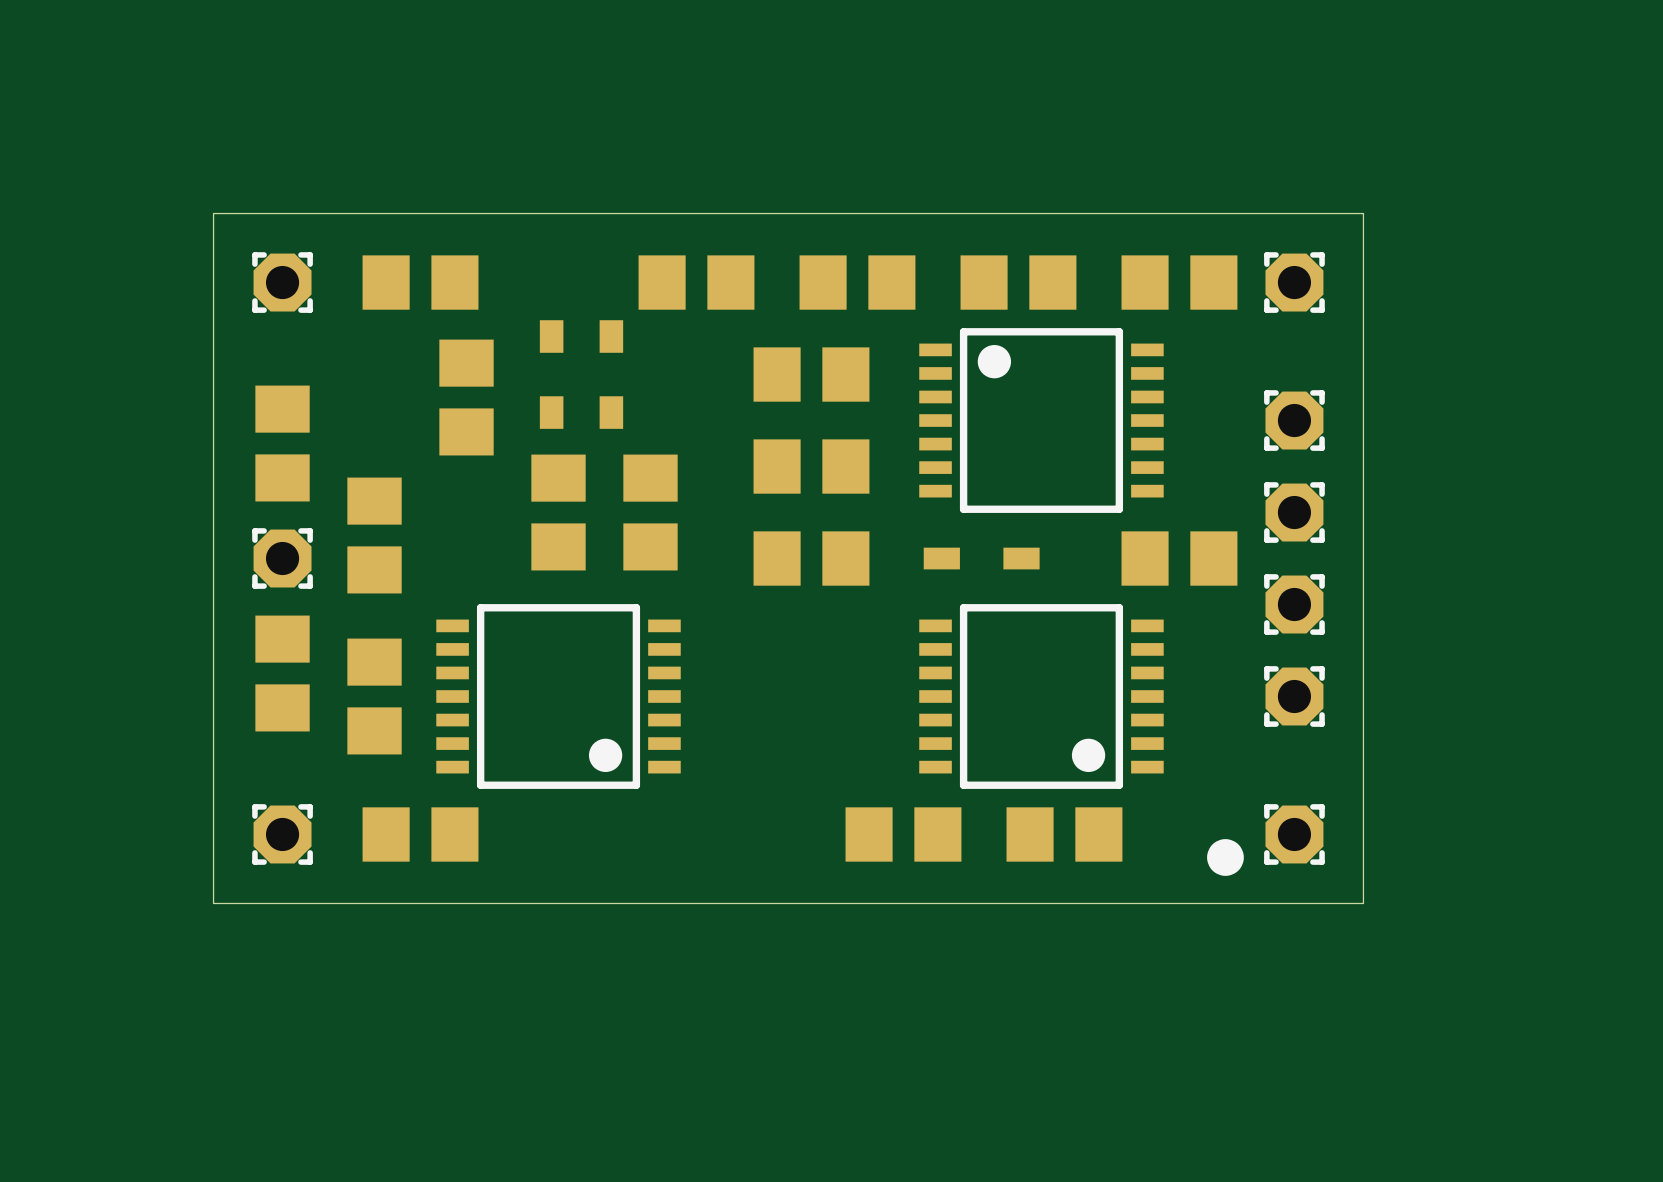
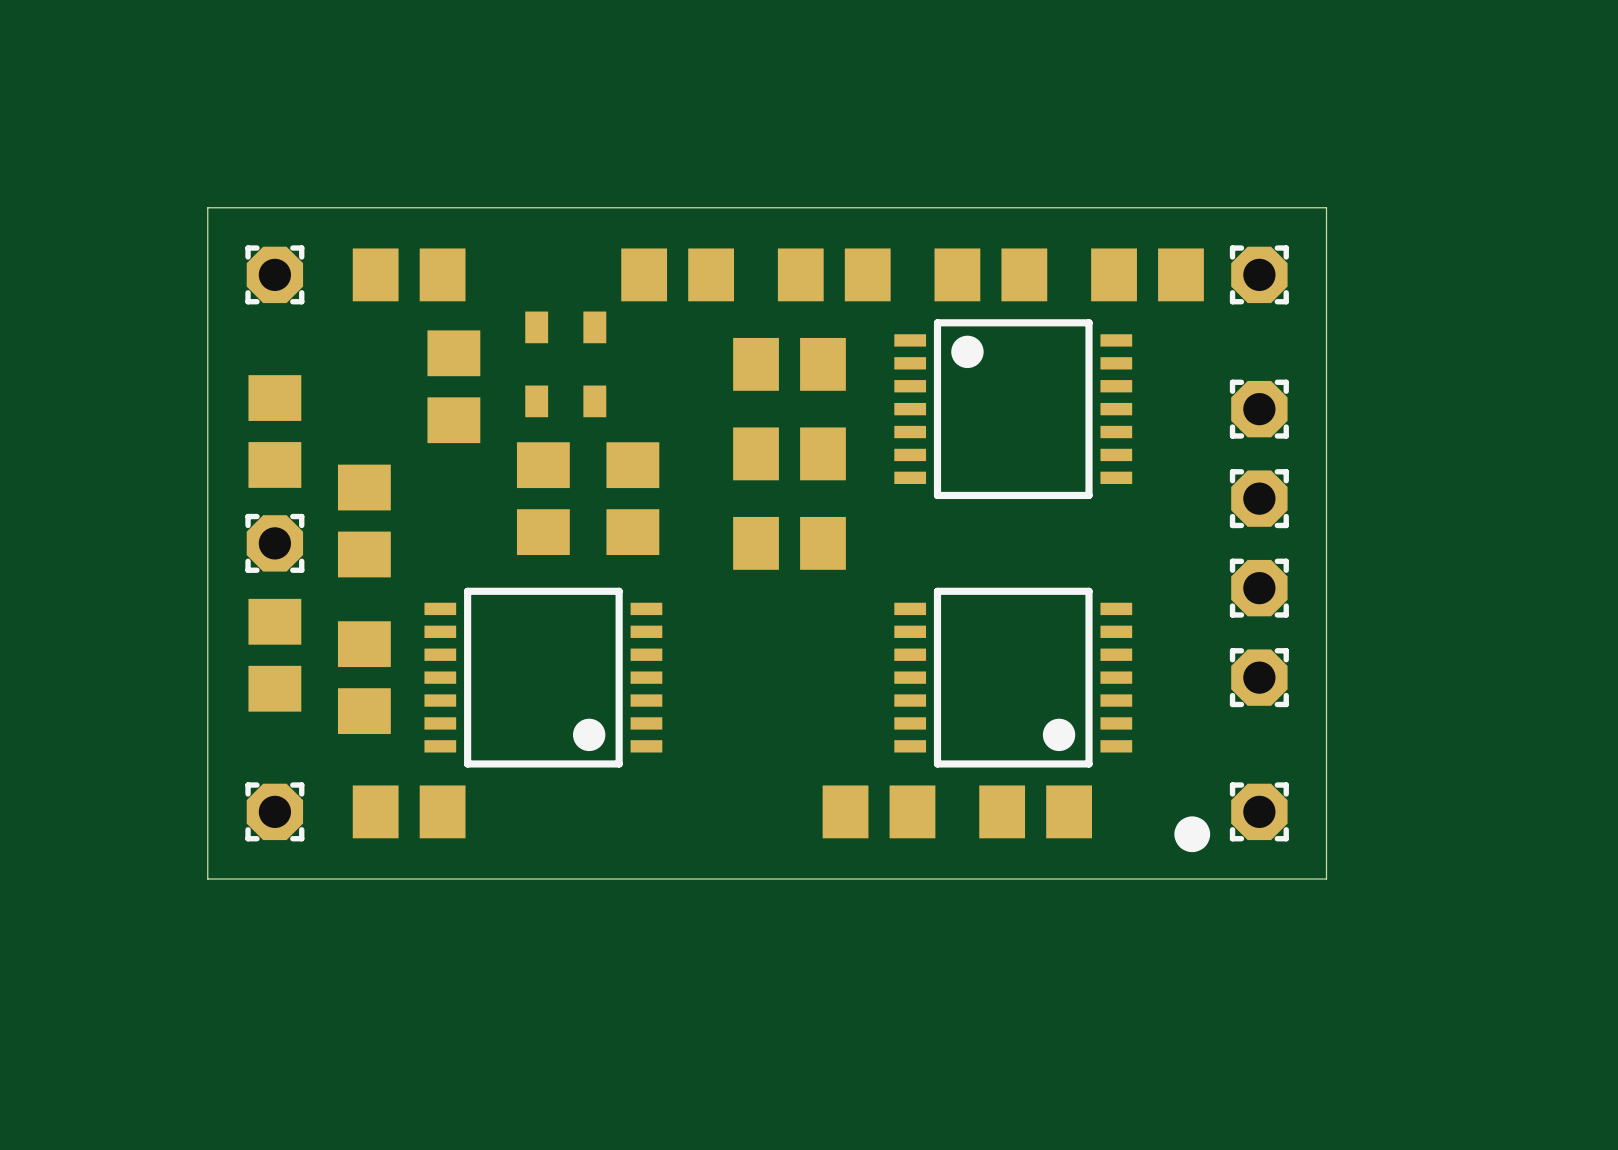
part: (981, 558) -> none
part: (1179, 558) -> none

